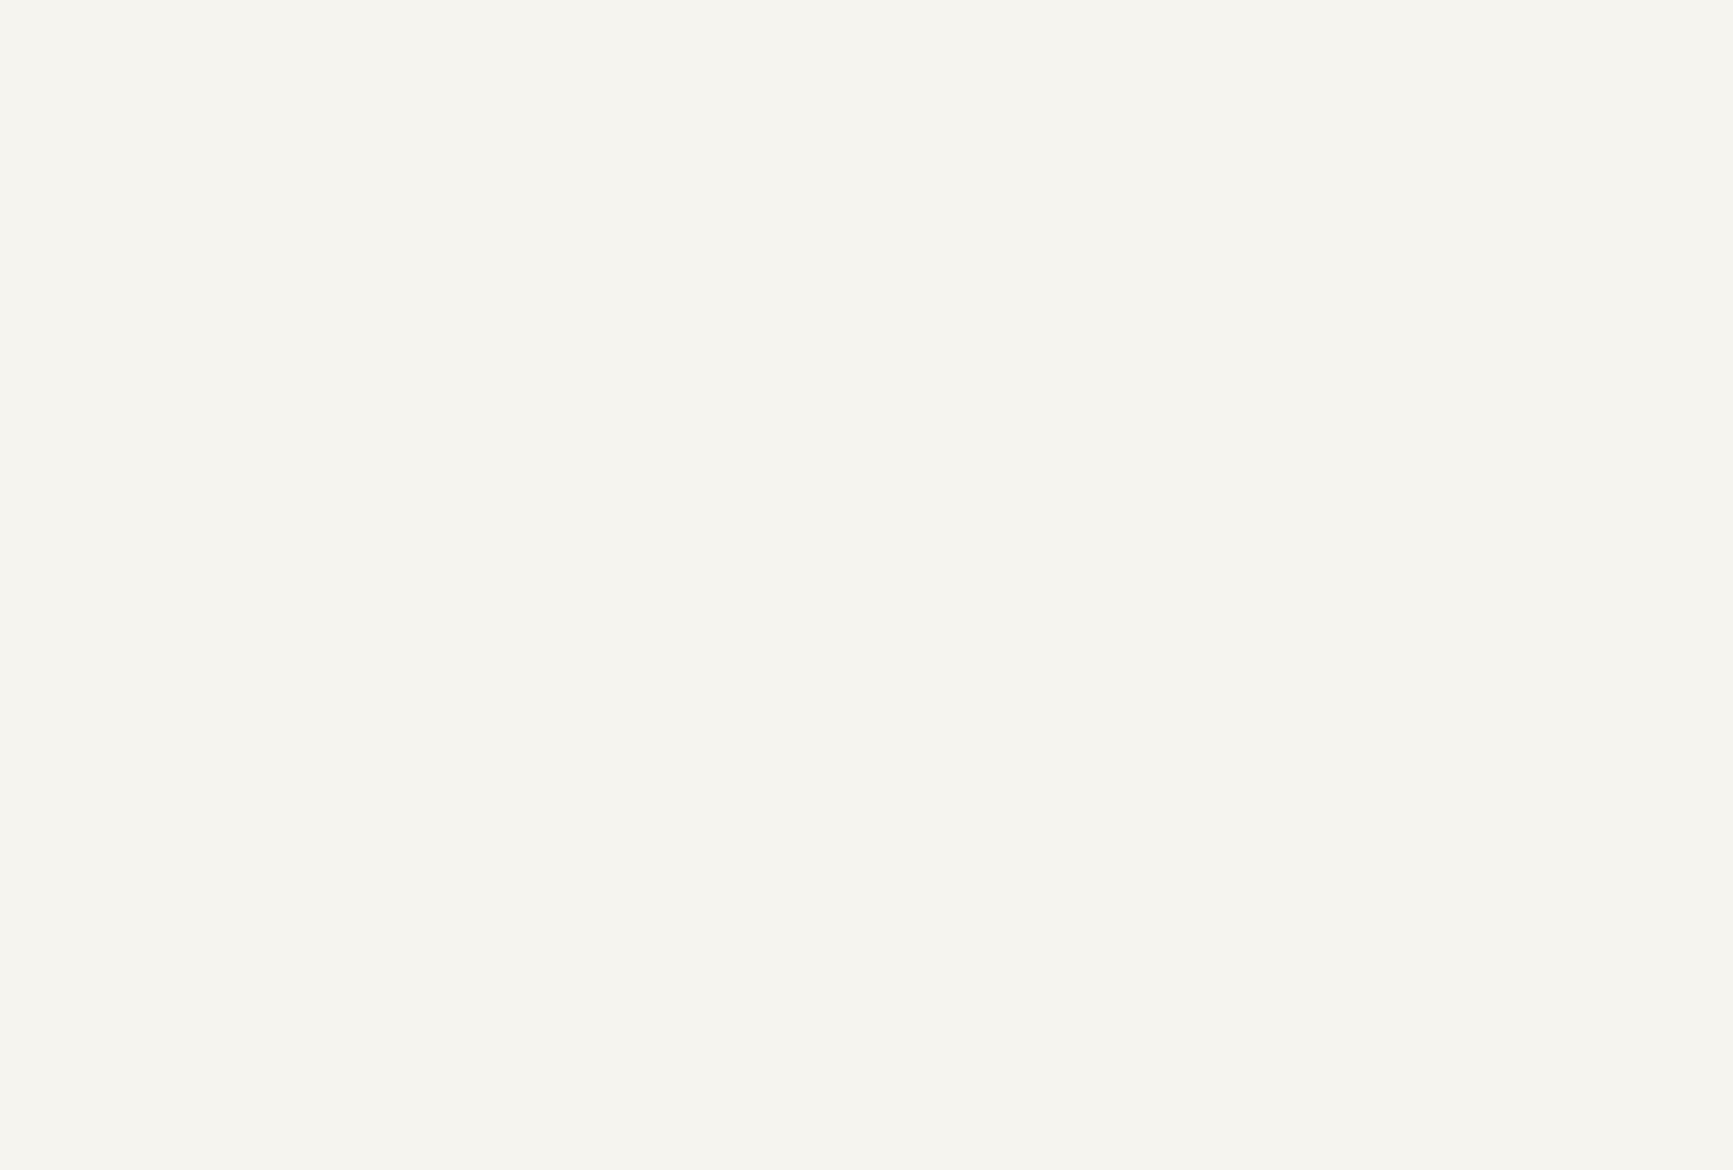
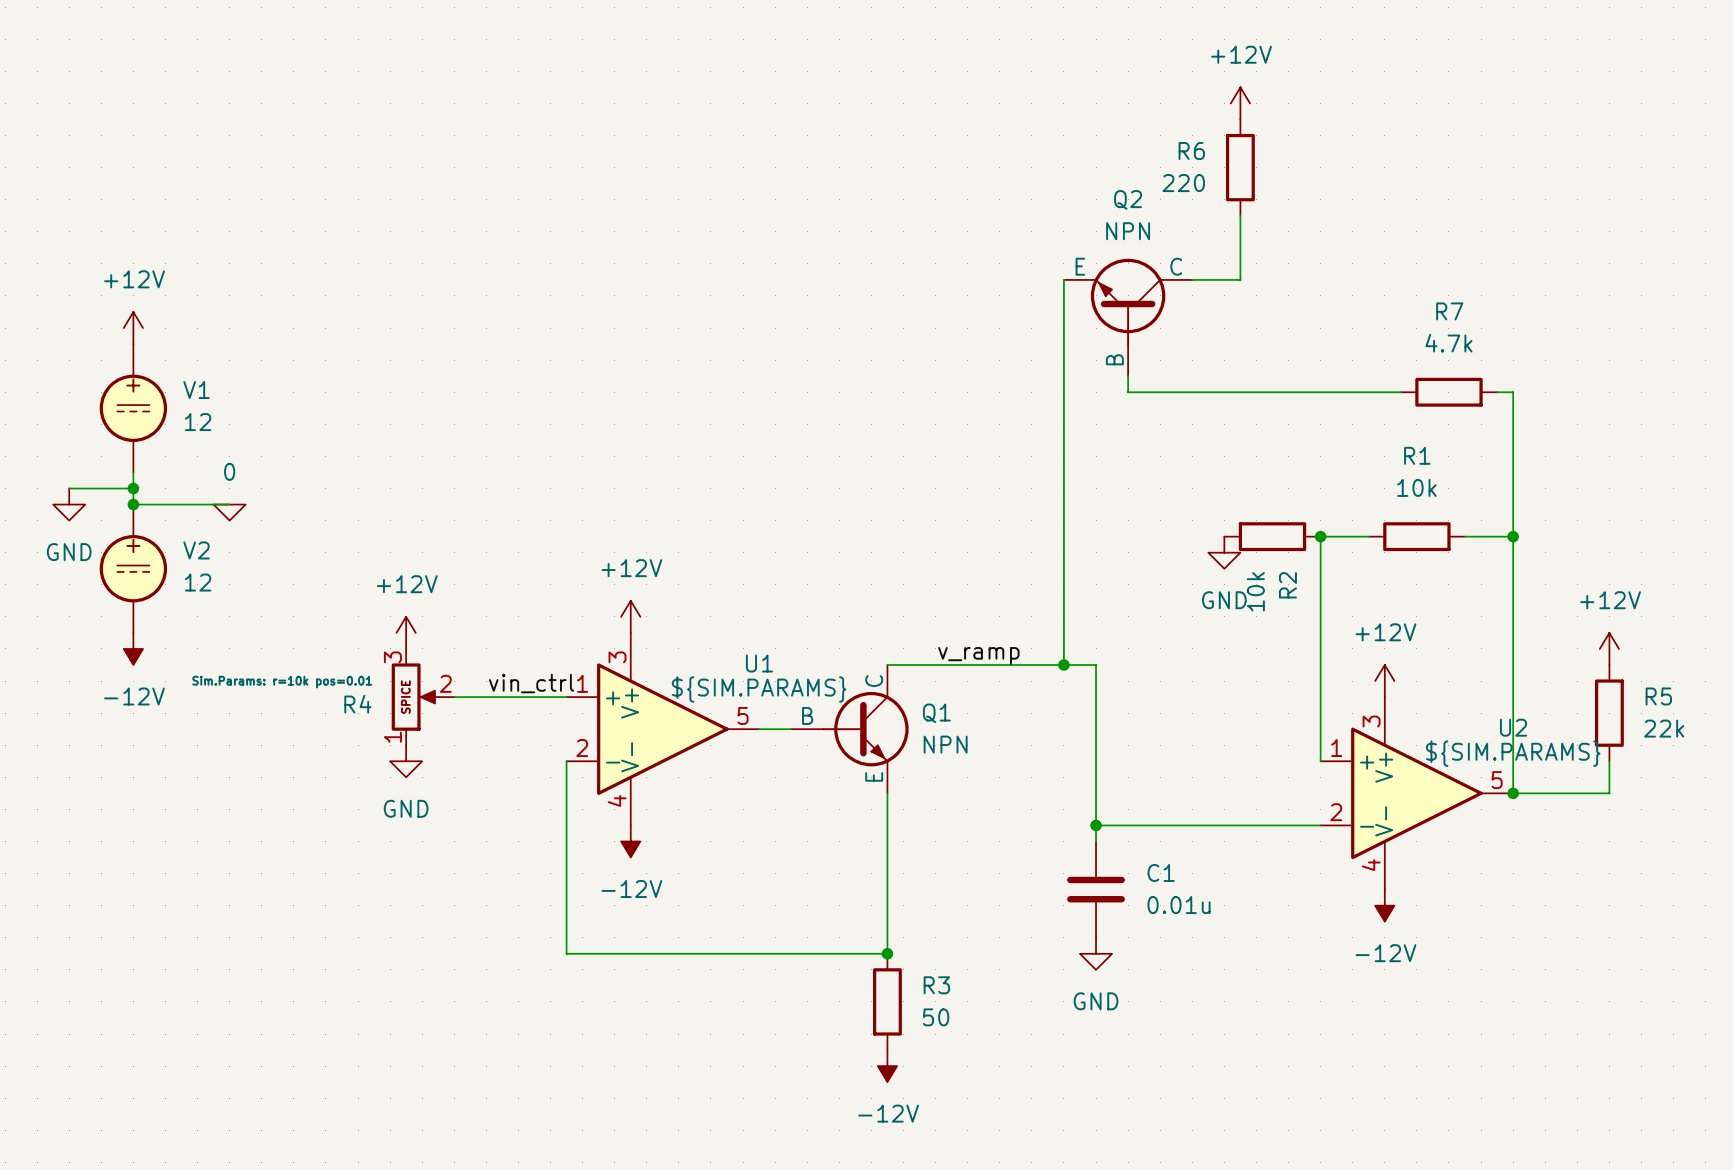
power symbol: none -> +12V (1240, 103)
R6: none -> 220 (1240, 167)
wire: none -> (1240, 215) (1240, 279) (1192, 279)
wire: none -> (1063, 279) (1063, 665)
Q2: none -> NPN (1128, 317)
power symbol: none -> +12V (133, 328)
wire: none -> (1128, 376) (1128, 392) (1400, 392)
R7: none -> 4.7k (1448, 392)
wire: none -> (1497, 392) (1513, 392) (1513, 793) (1609, 793) (1609, 761)
V1: none -> 12 (133, 408)
wire: none -> (133, 472) (133, 504) (229, 504)
wire: none -> (69, 488) (133, 488)
junction: none -> (133, 488)
power symbol: none -> GND (69, 504)
junction: none -> (133, 504)
power symbol: none -> 0 (229, 512)
R2: none -> 10k (1272, 536)
junction: none -> (1320, 536)
wire: none -> (1368, 536) (1320, 536) (1320, 761)
R1: none -> 10k (1416, 536)
wire: none -> (1465, 536) (1513, 536)
junction: none -> (1513, 536)
power symbol: none -> GND (1224, 552)
V2: none -> 12 (133, 568)
power symbol: none -> +12V (630, 616)
power symbol: none -> +12V (406, 632)
power symbol: none -> -12V (133, 648)
power symbol: none -> +12V (1609, 648)
label: none -> v_ramp (978, 656)
wire: none -> (887, 665) (1096, 665) (1096, 841)
junction: none -> (1063, 665)
power symbol: none -> +12V (1384, 681)
label: none -> vin_ctrl (531, 683)
R4: none -> (422, 697)
wire: none -> (454, 697) (566, 697)
R5: none -> 22k (1609, 713)
U1: none -> ${SIM.PARAMS} (662, 729)
wire: none -> (759, 729) (791, 729)
Q1: none -> NPN (849, 729)
power symbol: none -> GND (406, 761)
wire: none -> (566, 761) (566, 953) (887, 953) (887, 793)
U2: none -> ${SIM.PARAMS} (1416, 793)
junction: none -> (1513, 793)
wire: none -> (1096, 825) (1320, 825)
junction: none -> (1096, 825)
power symbol: none -> -12V (630, 841)
C1: none -> 0.01u (1096, 889)
power symbol: none -> -12V (1384, 905)
junction: none -> (887, 953)
power symbol: none -> GND (1096, 953)
R3: none -> 50 (887, 1001)
power symbol: none -> -12V (887, 1066)

